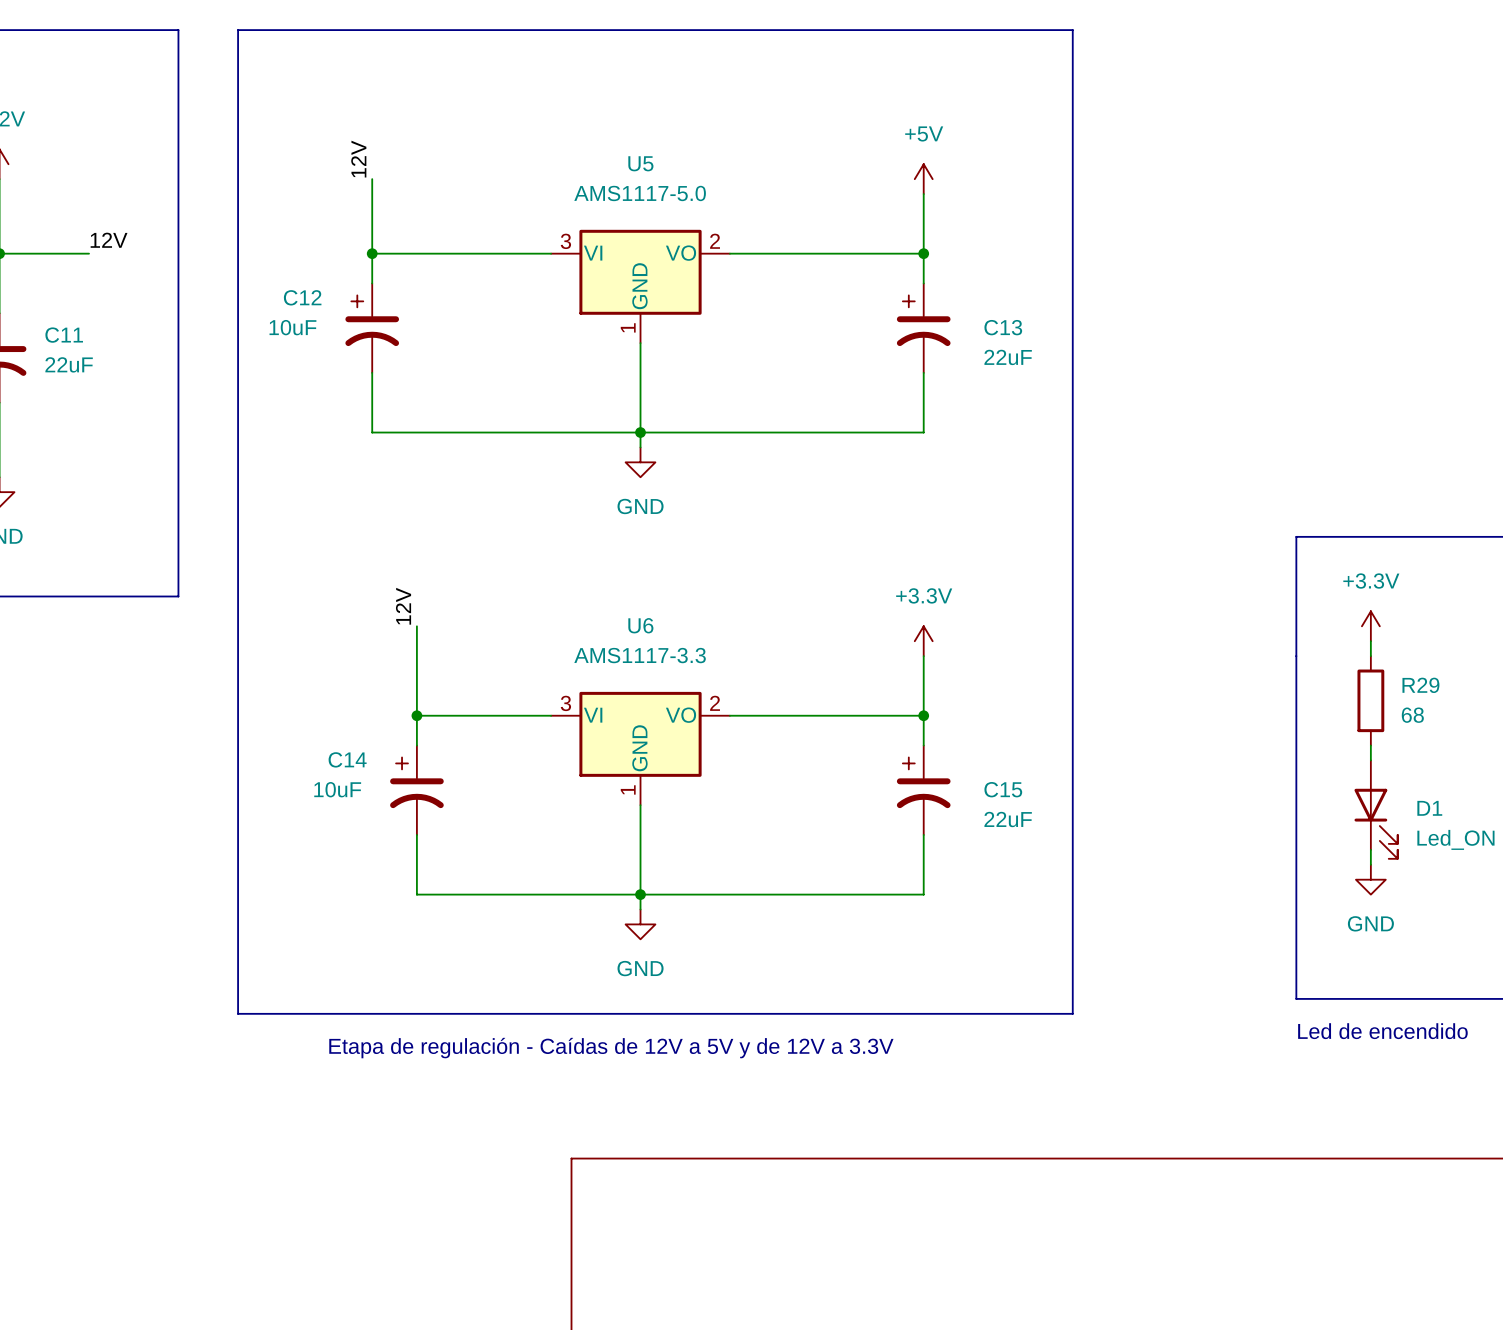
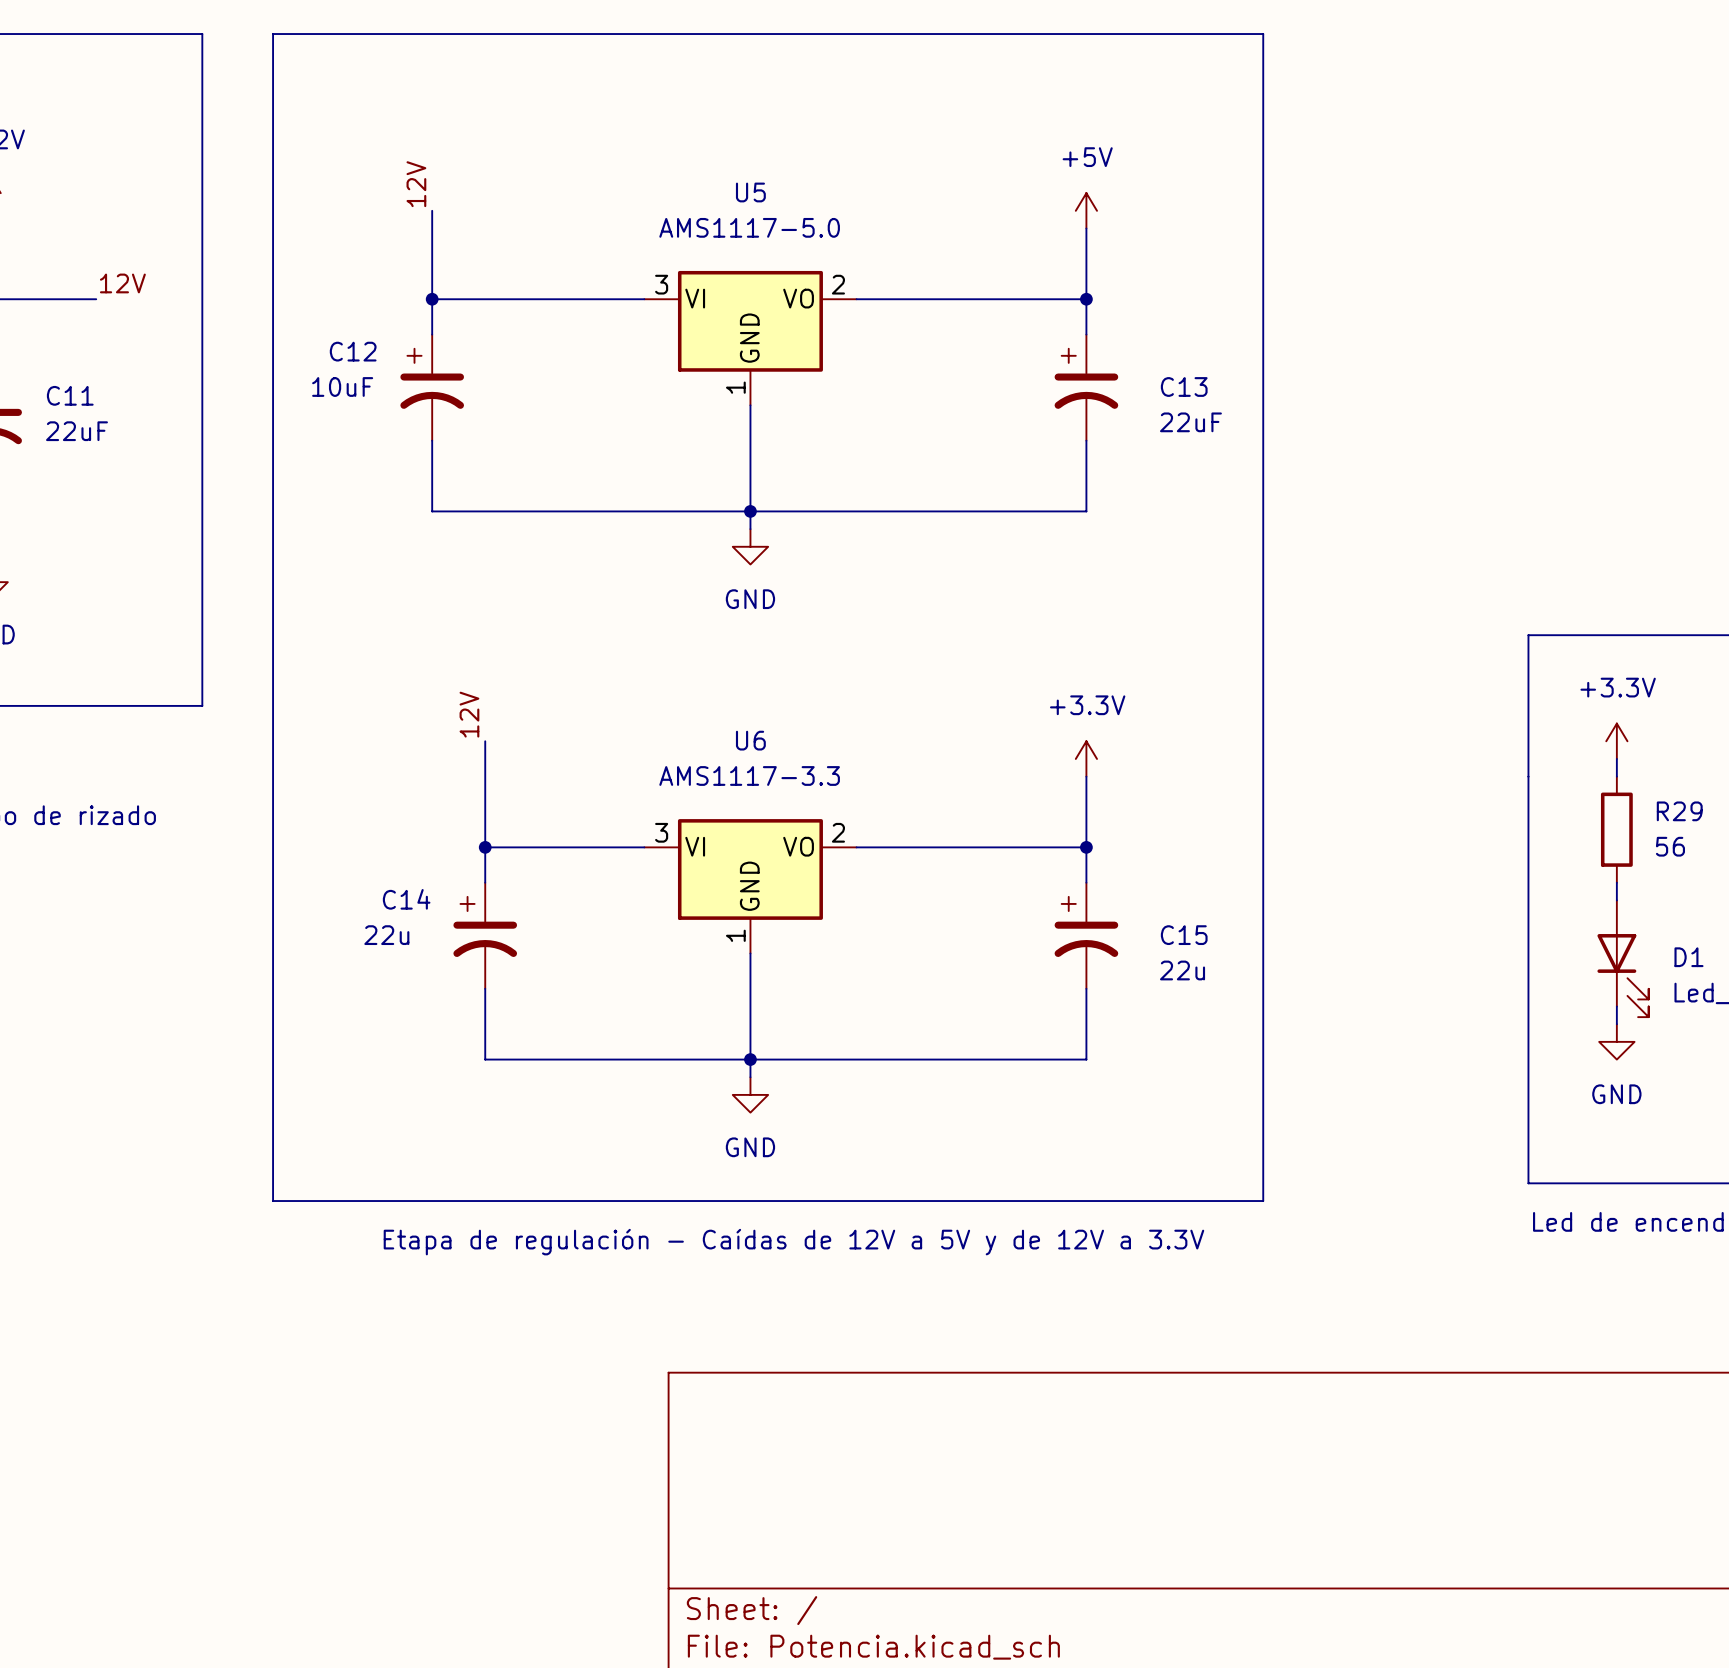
R29 value: 68 (1412, 715) -> 56 (1670, 846)
C14 value: 10uF (337, 789) -> 22u (386, 935)
C15 value: 22uF (1008, 819) -> 22u (1182, 970)

